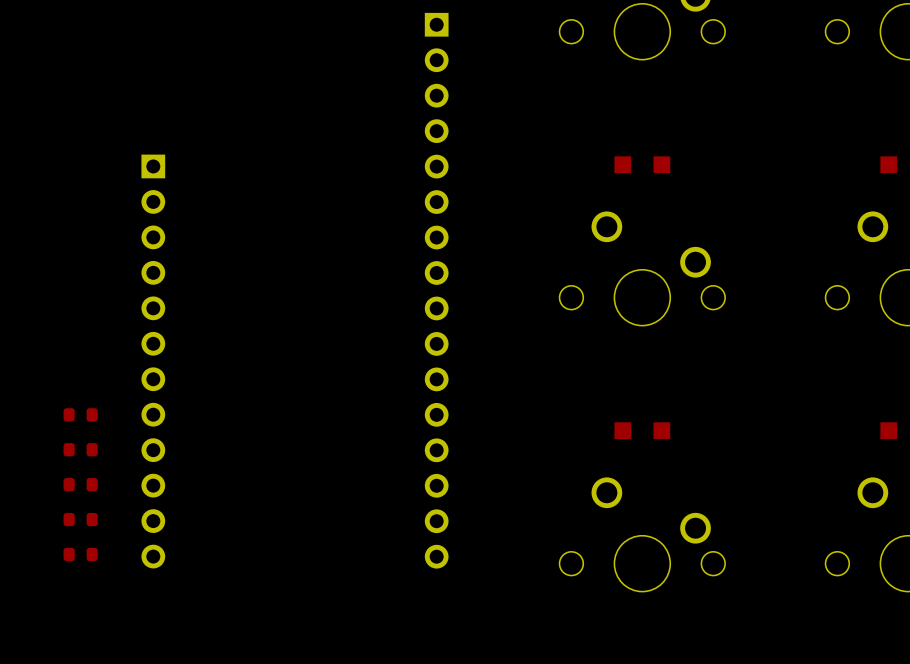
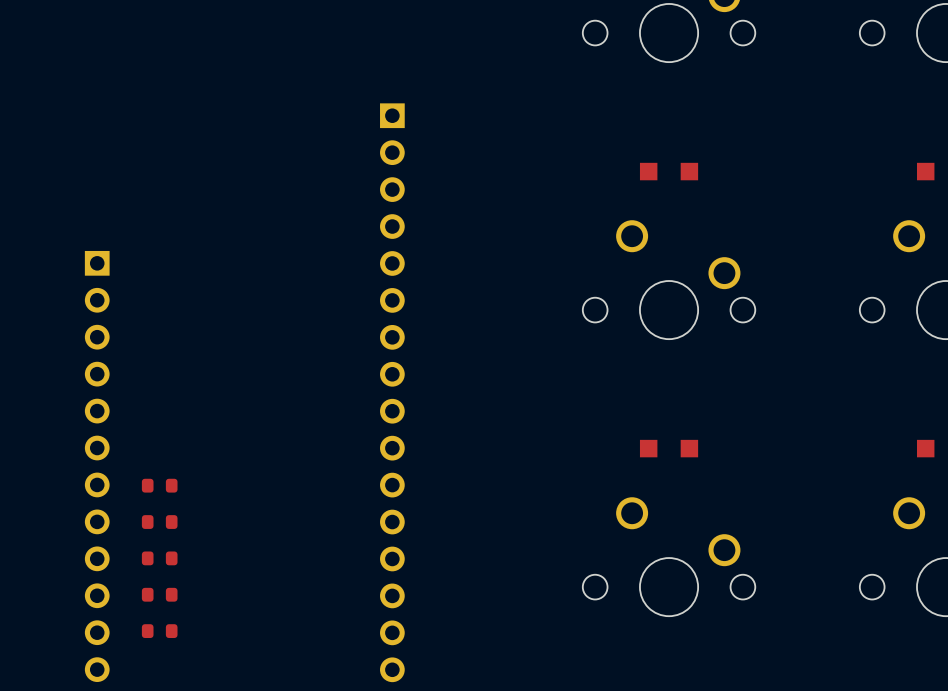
part position: (436, 290) -> (392, 392)
part: (153, 361) -> none
part: (80, 414) -> none
part footprint: [63, 443, 98, 457] -> [84, 250, 110, 683]
part: none -> (159, 485)
part: (80, 484) -> none
part: none -> (159, 522)
part: (80, 519) -> none
part: none -> (159, 558)
part: (80, 554) -> none
part: none -> (159, 594)
part: none -> (159, 631)

